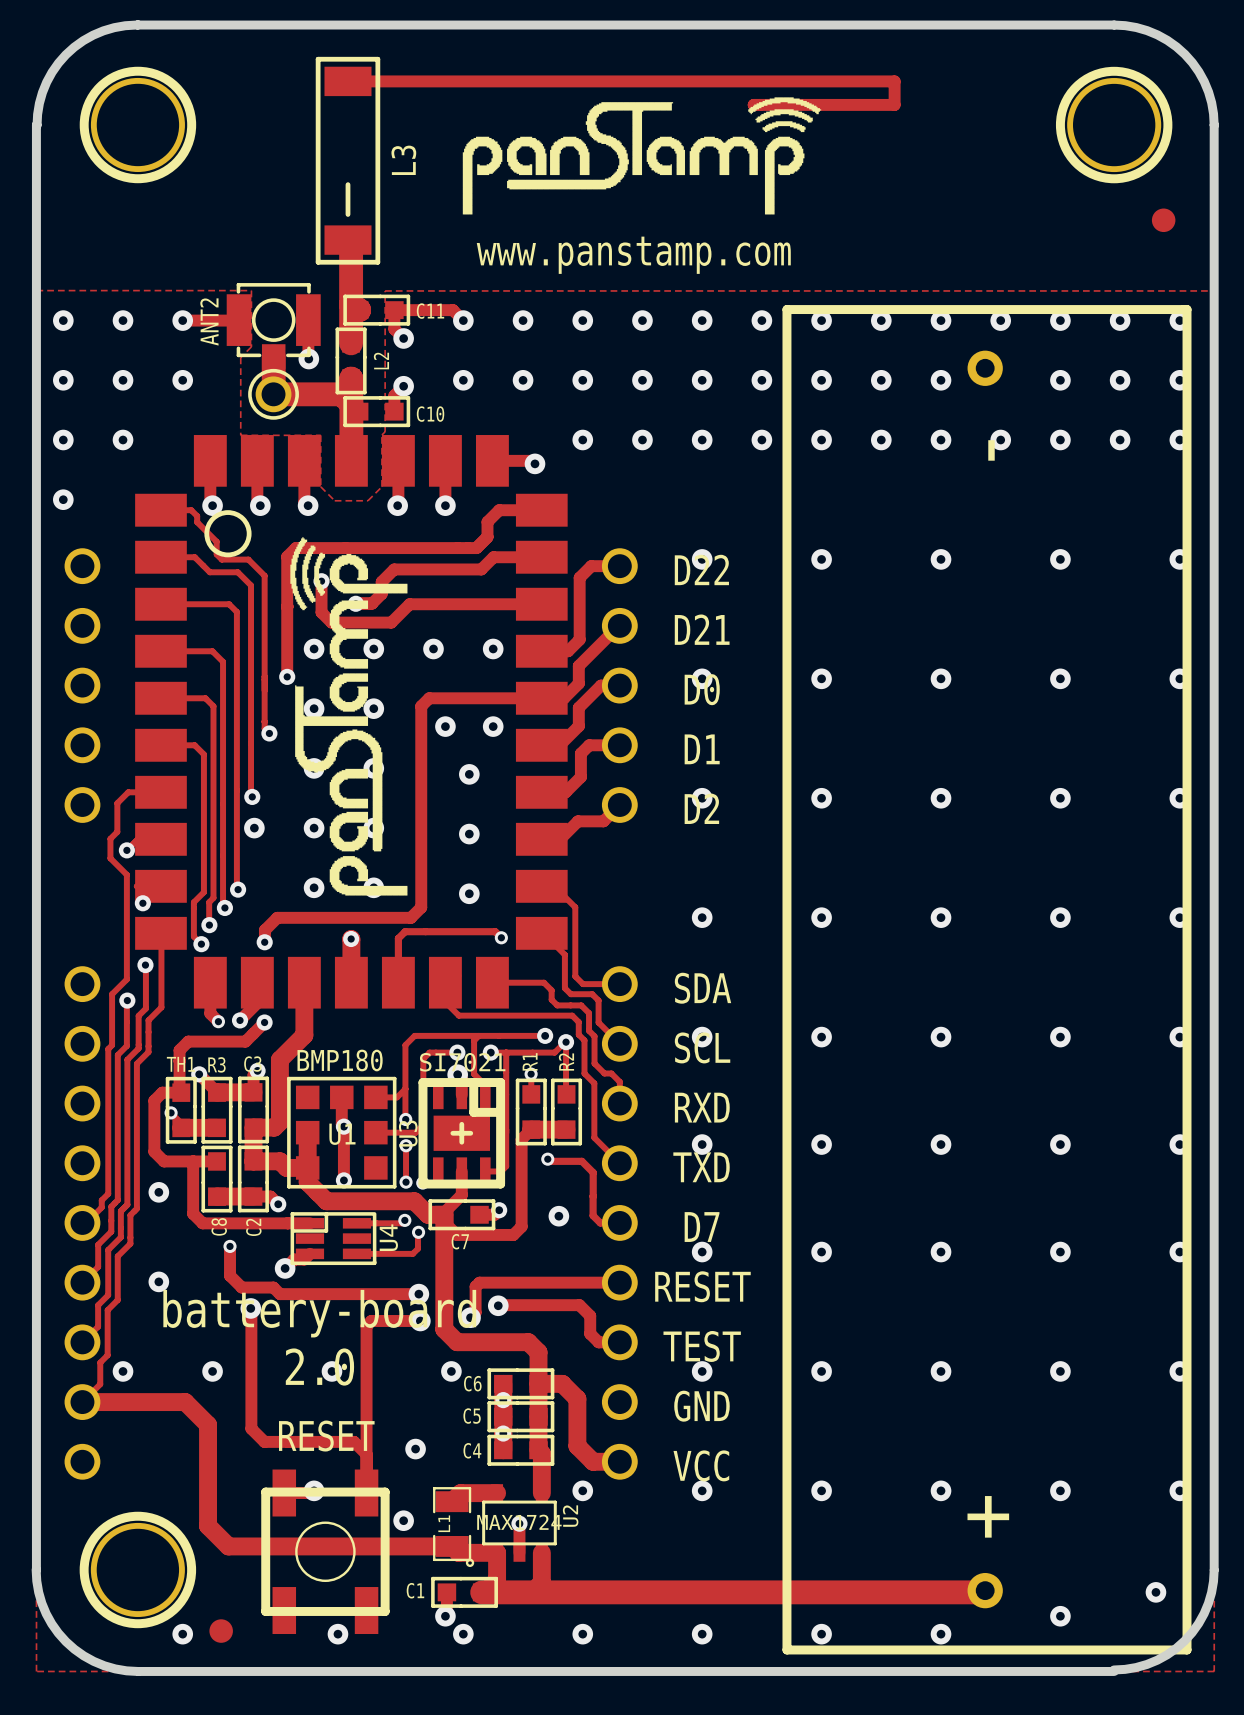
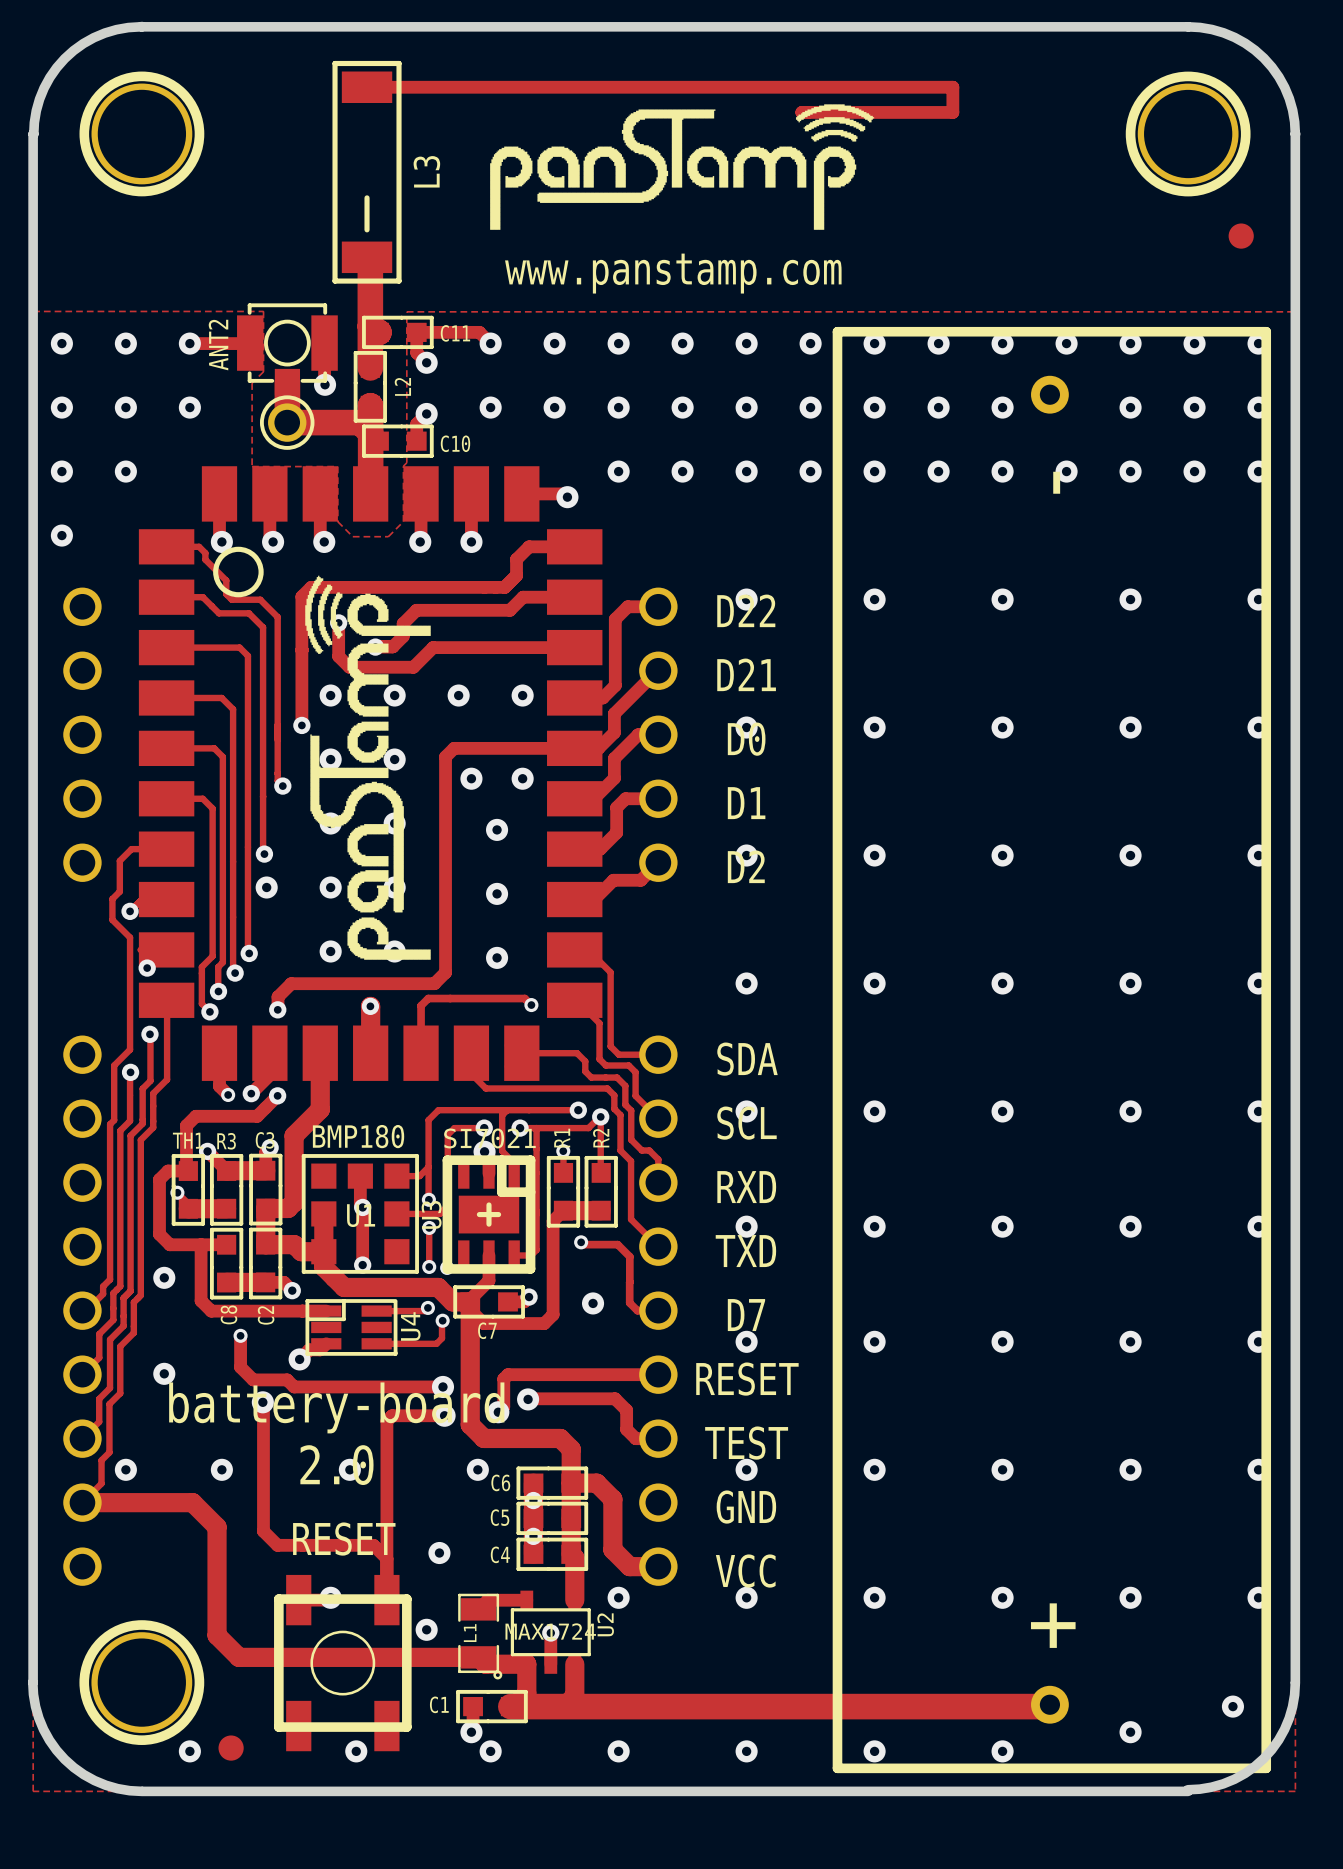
track width: thick (497, 1493) (460, 1493) (452, 1501) -> thin (526, 1600) (487, 1600) (478, 1609)

